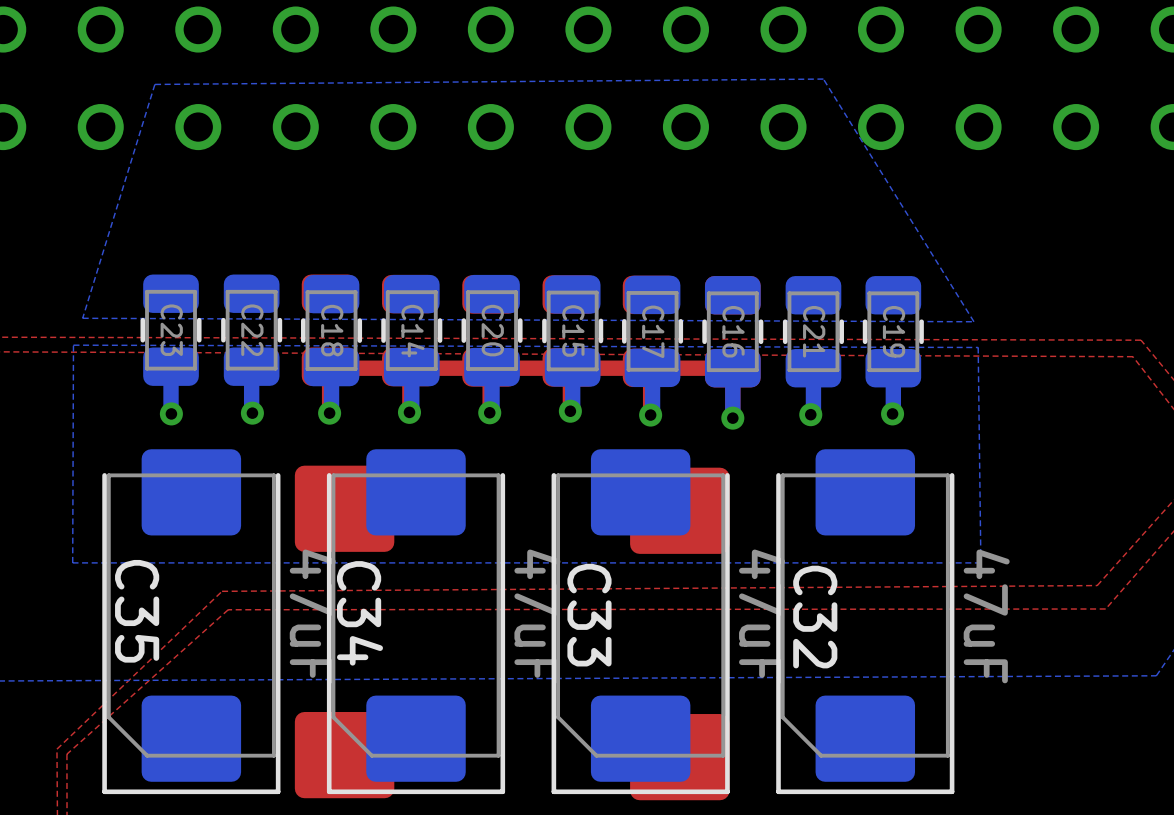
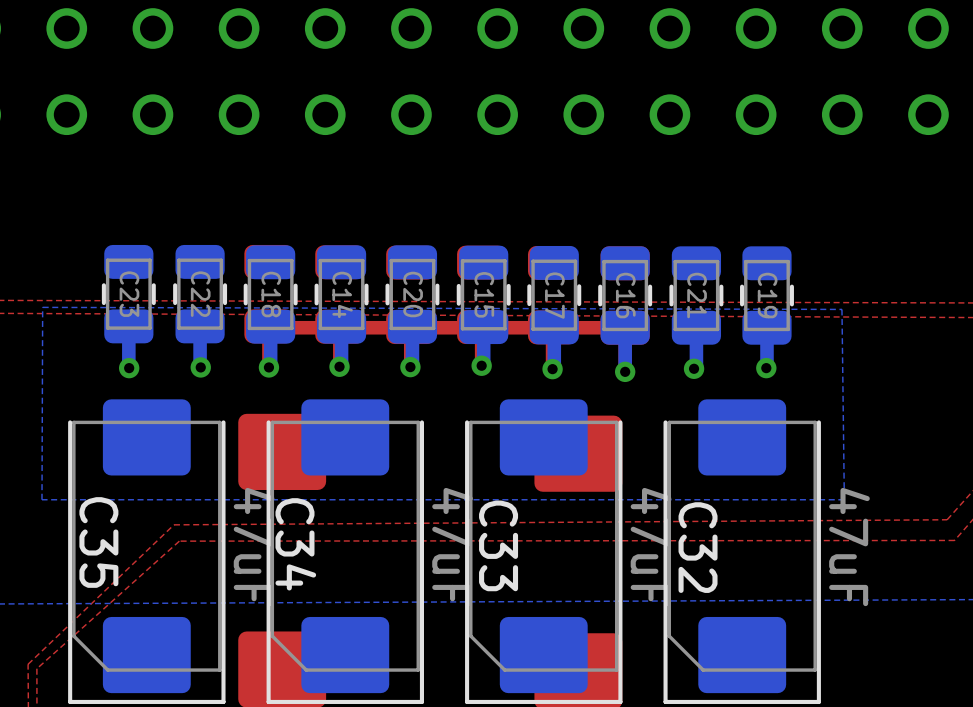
bottom zone outline: (823, 79) (973, 321) (82, 318) (154, 84) (823, 79) -> none

